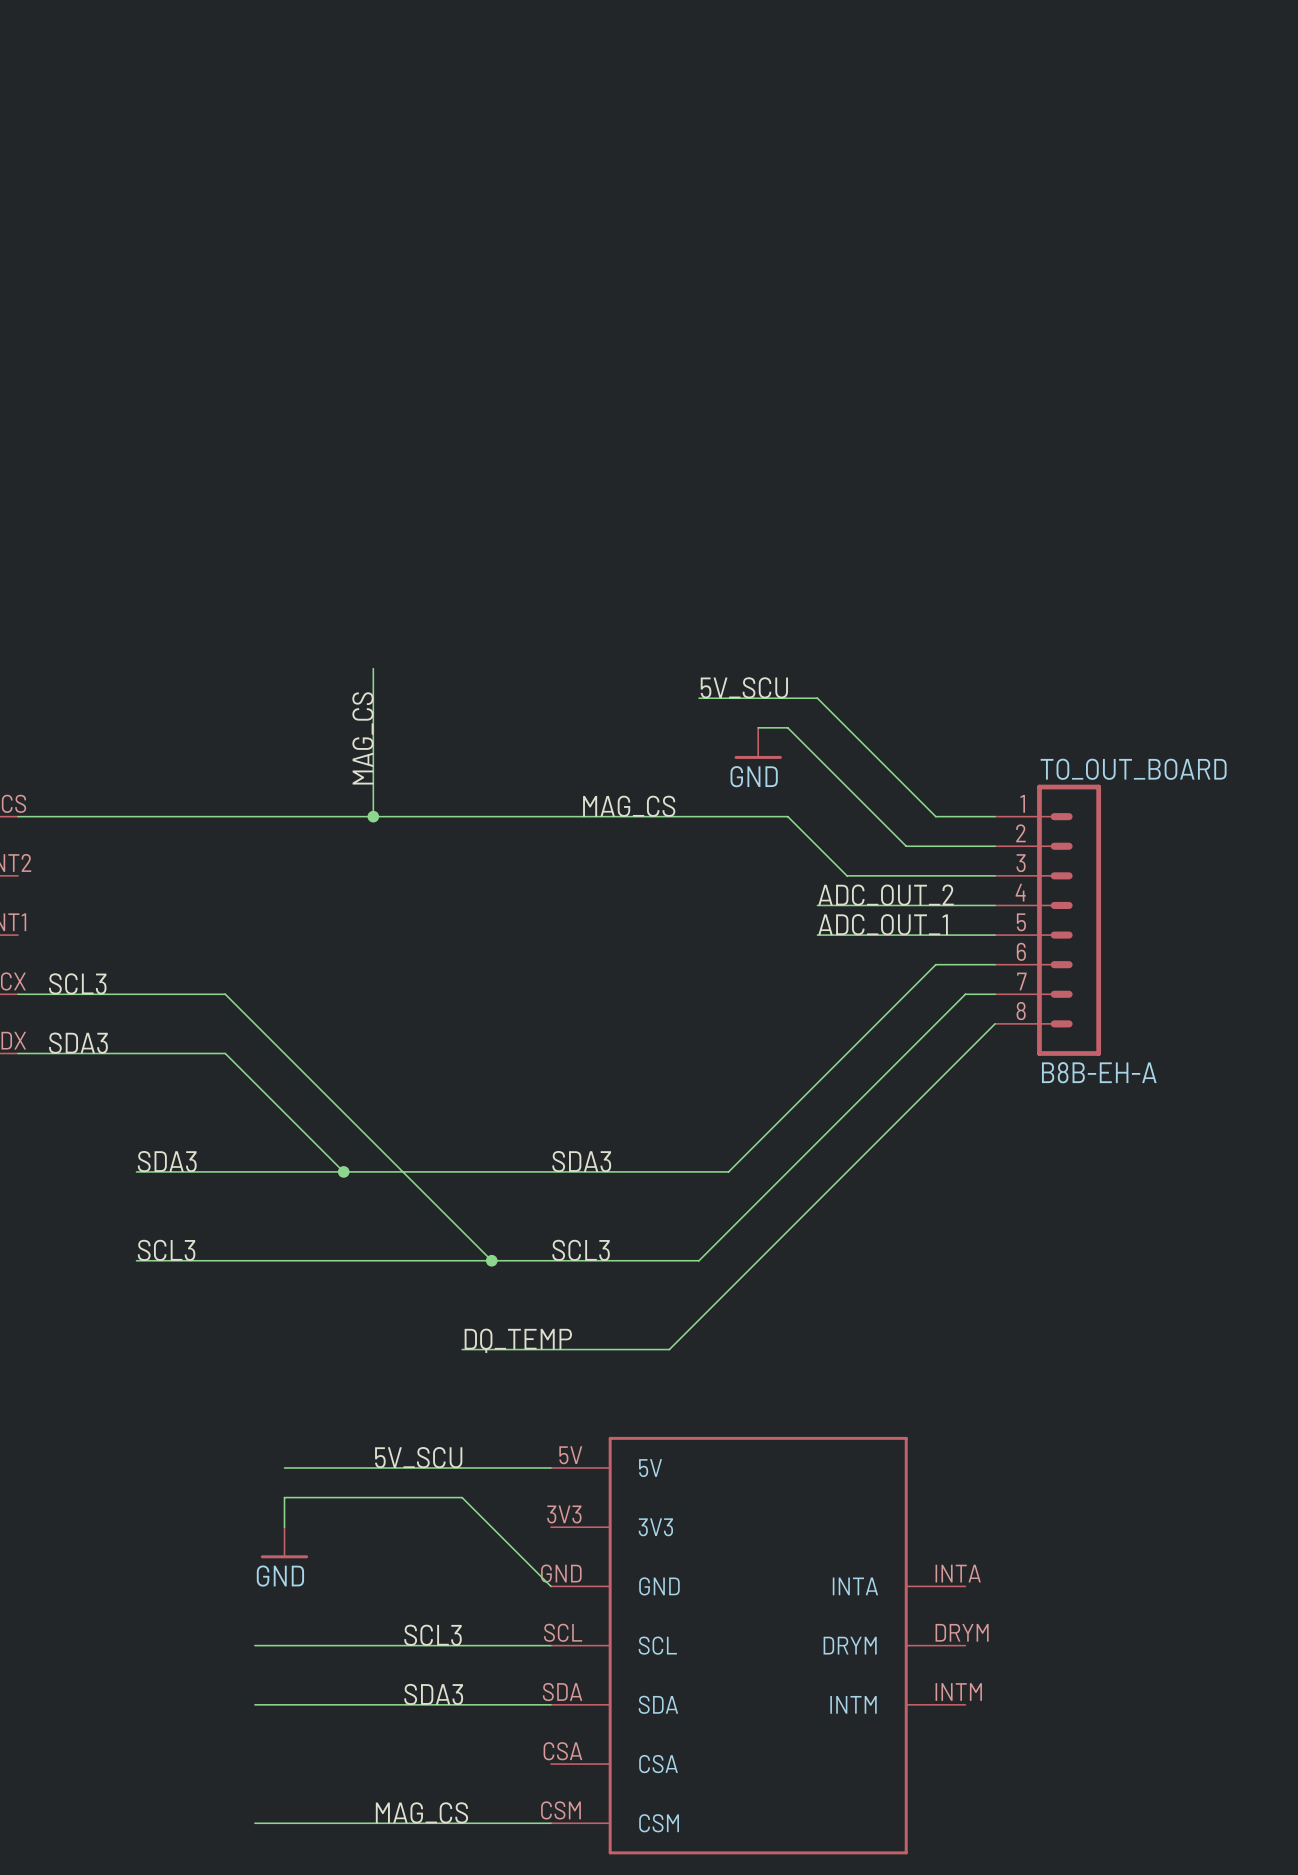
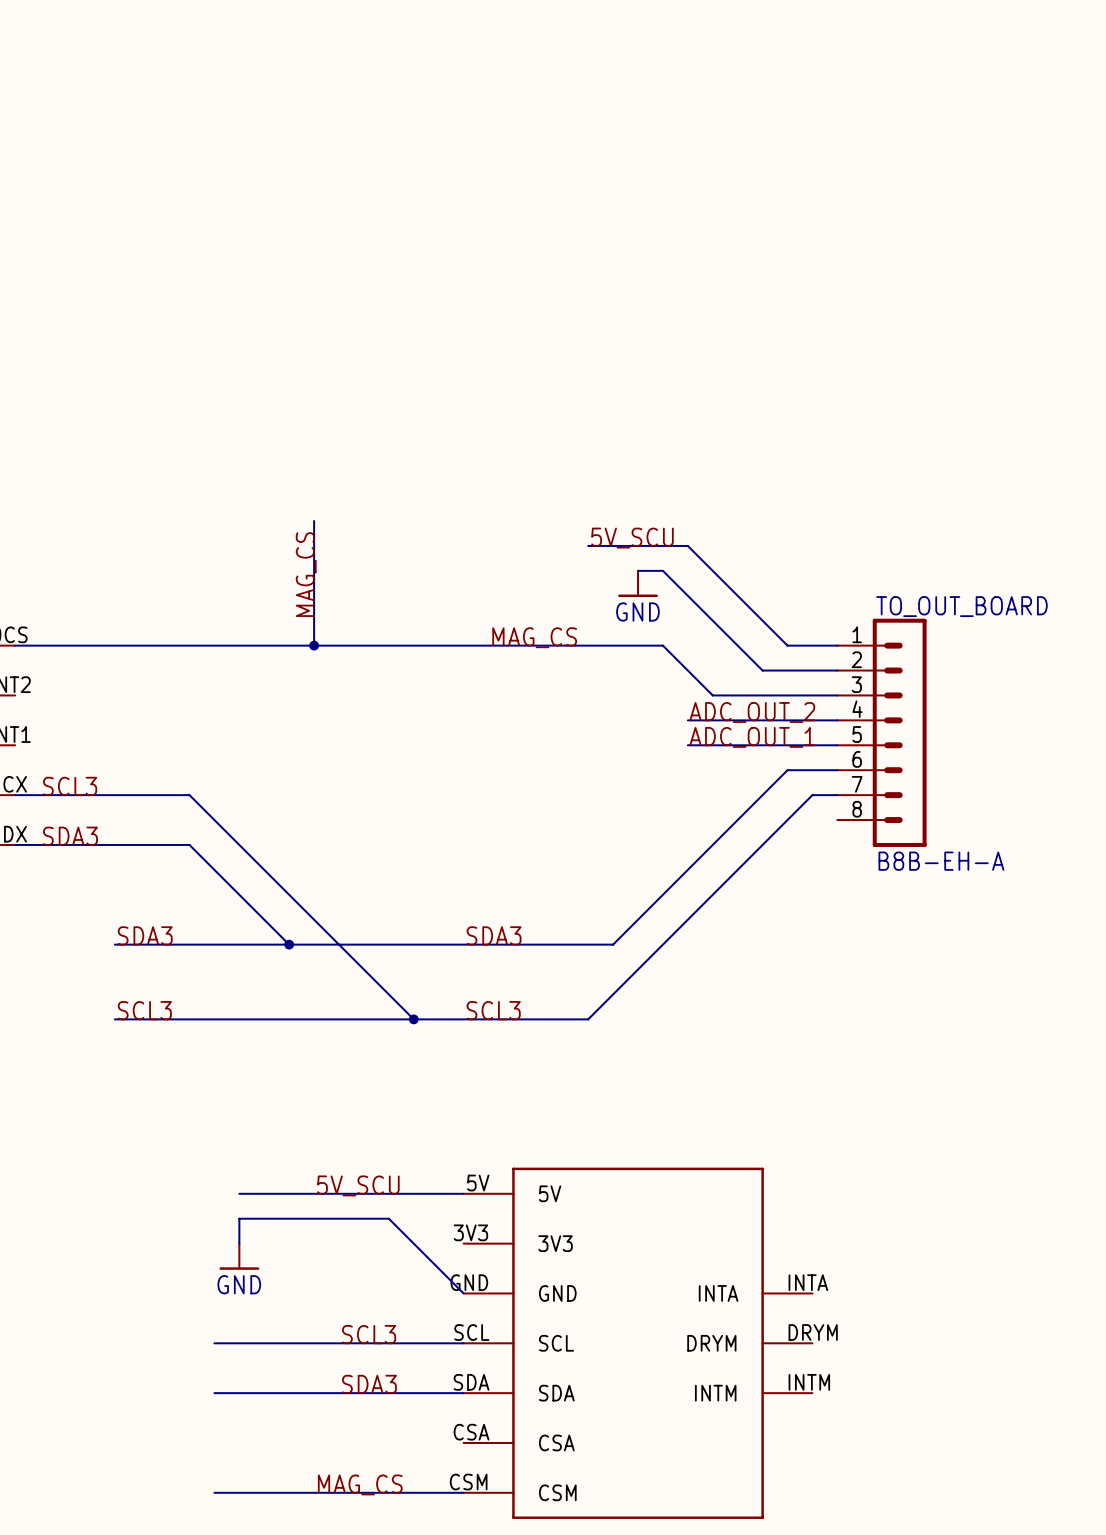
wire: (995, 1023) (669, 1349) (462, 1349) -> none
label: DQ_TEMP (518, 1340) -> none

